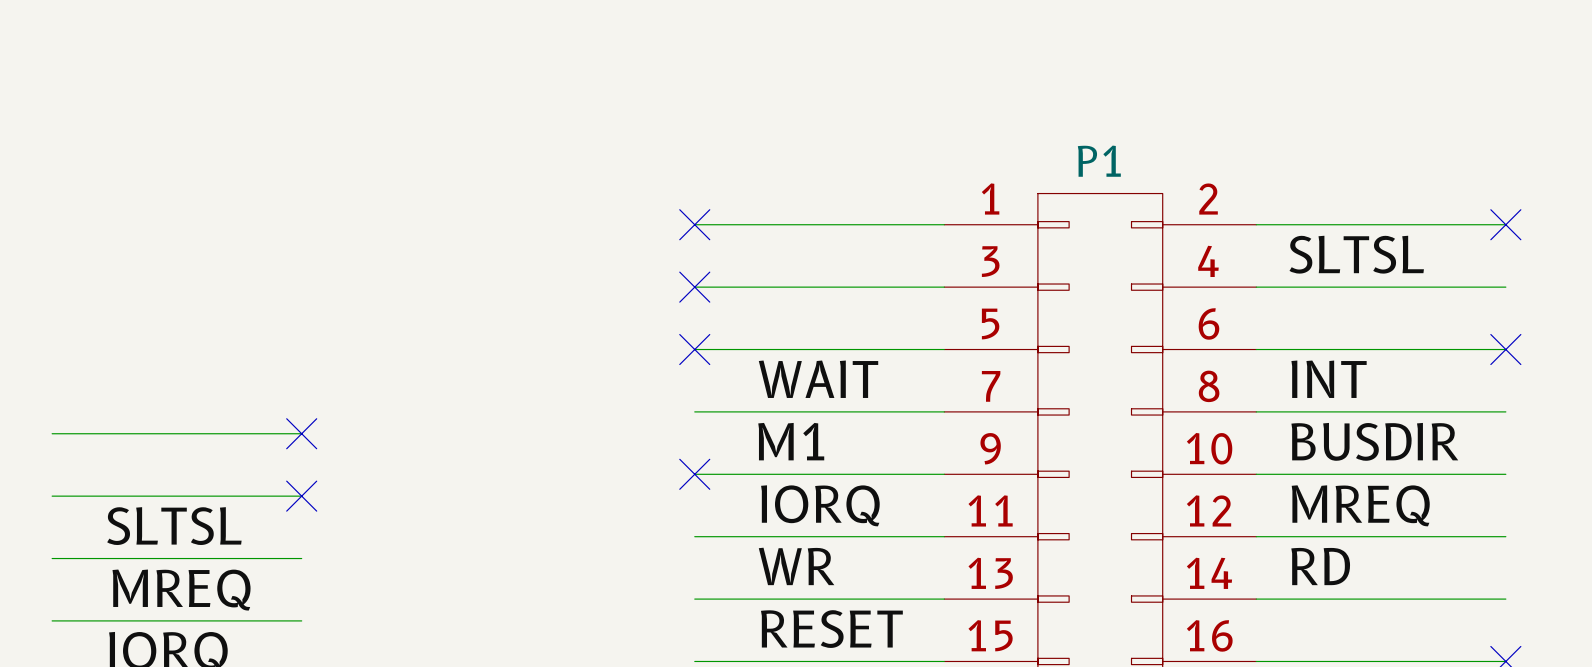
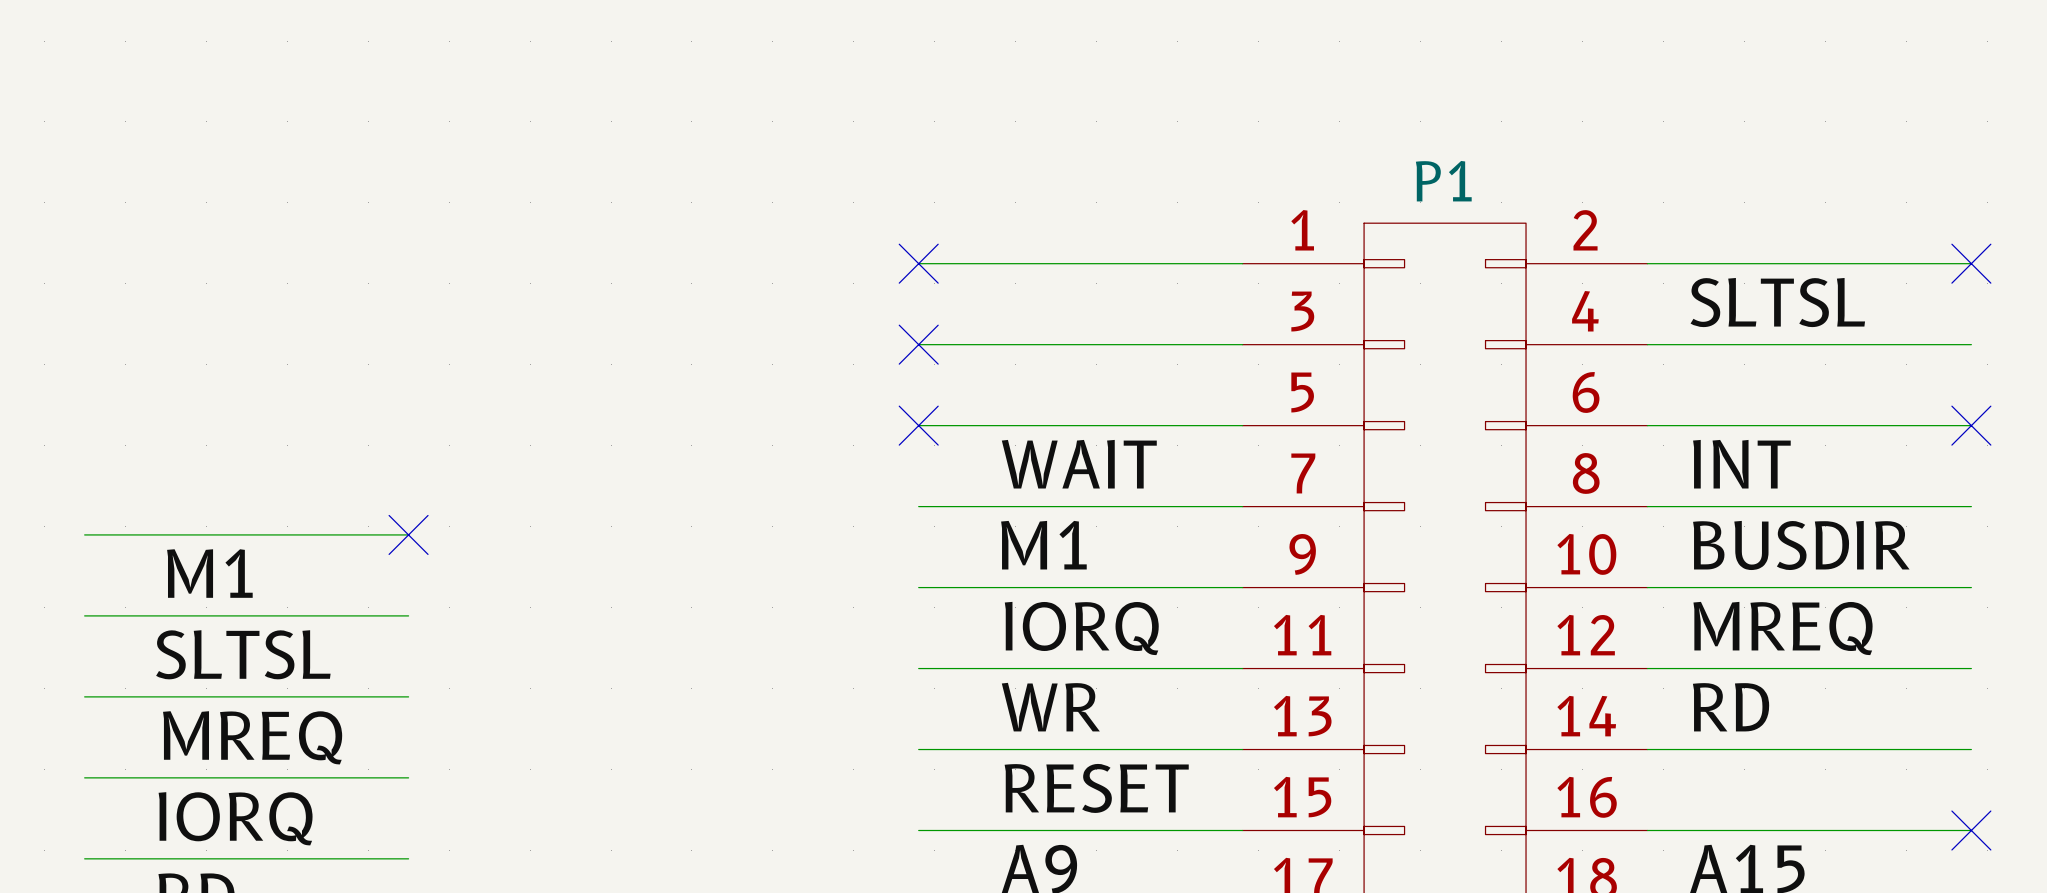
label: none -> M1 (209, 573)
no-connect mark: (694, 474) -> none
no-connect mark: (301, 496) -> none

